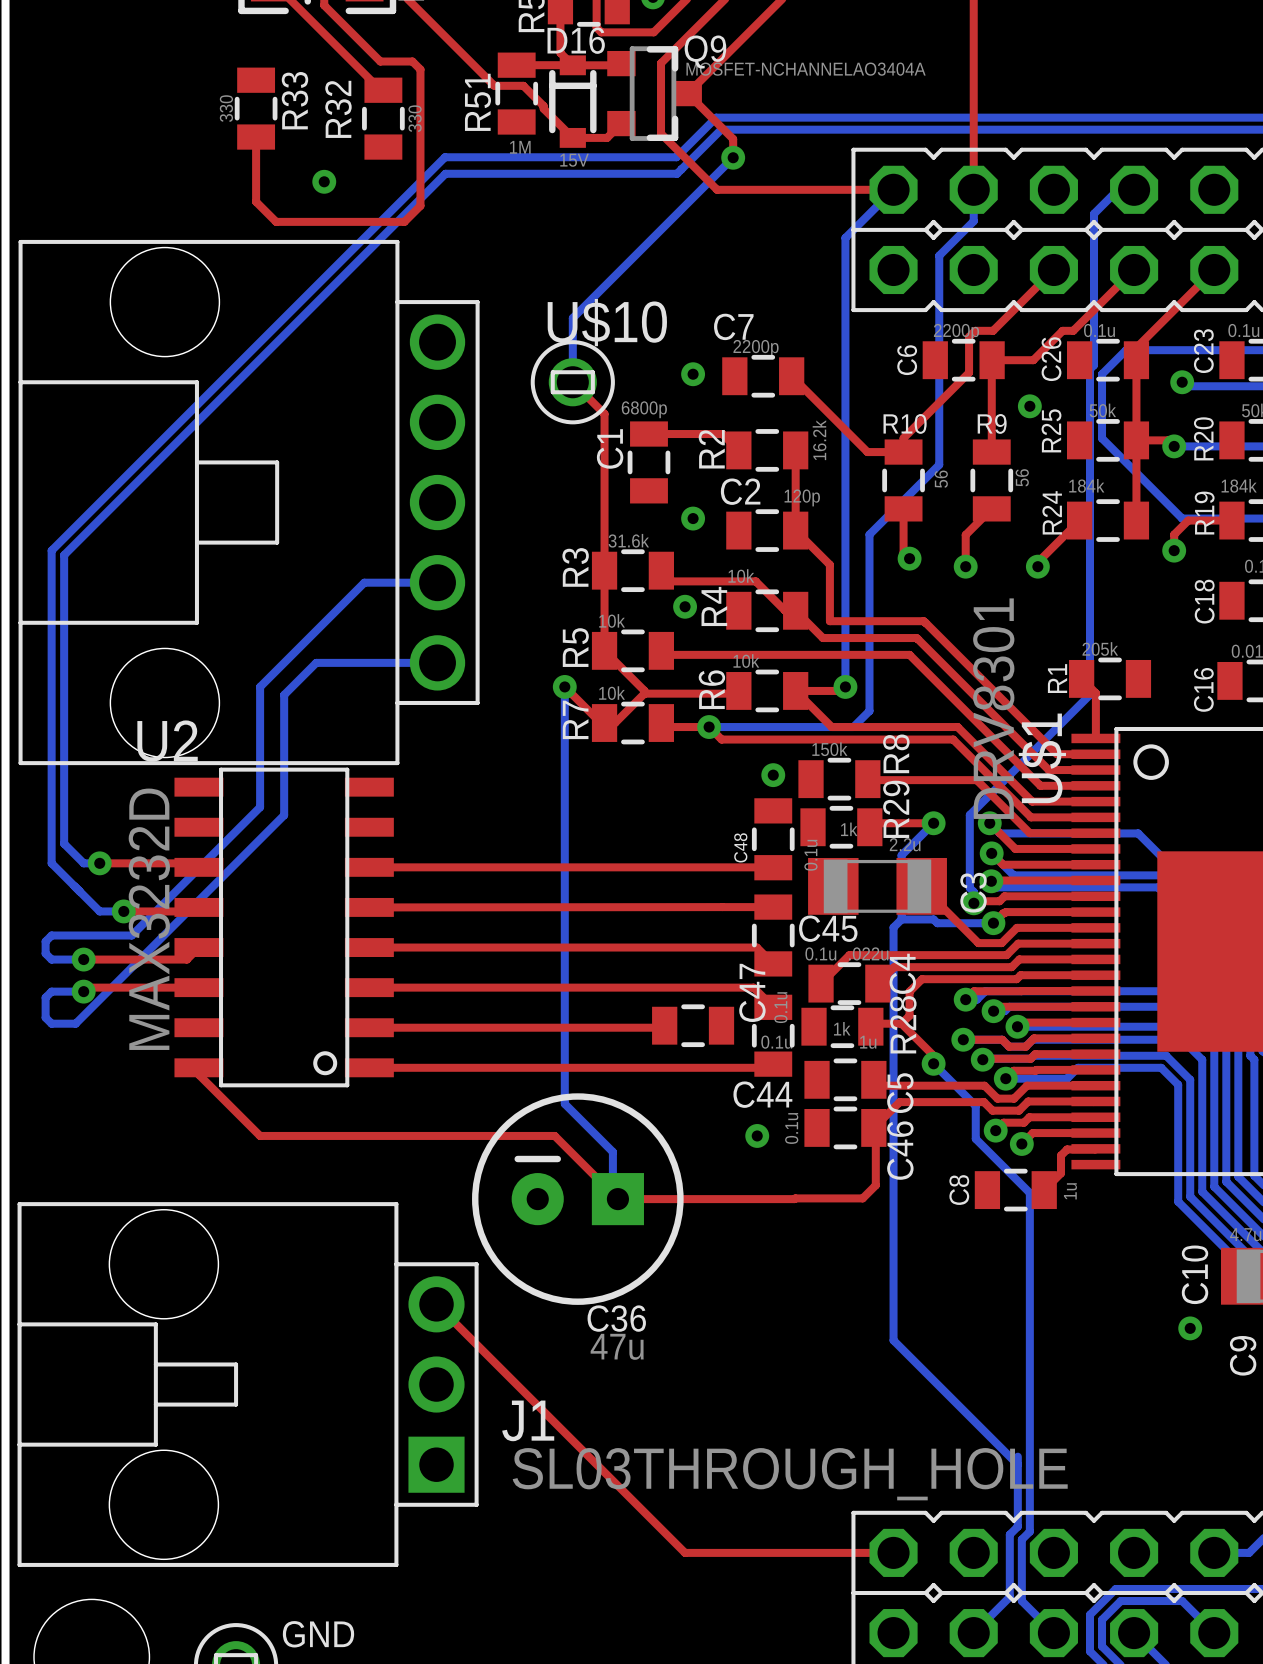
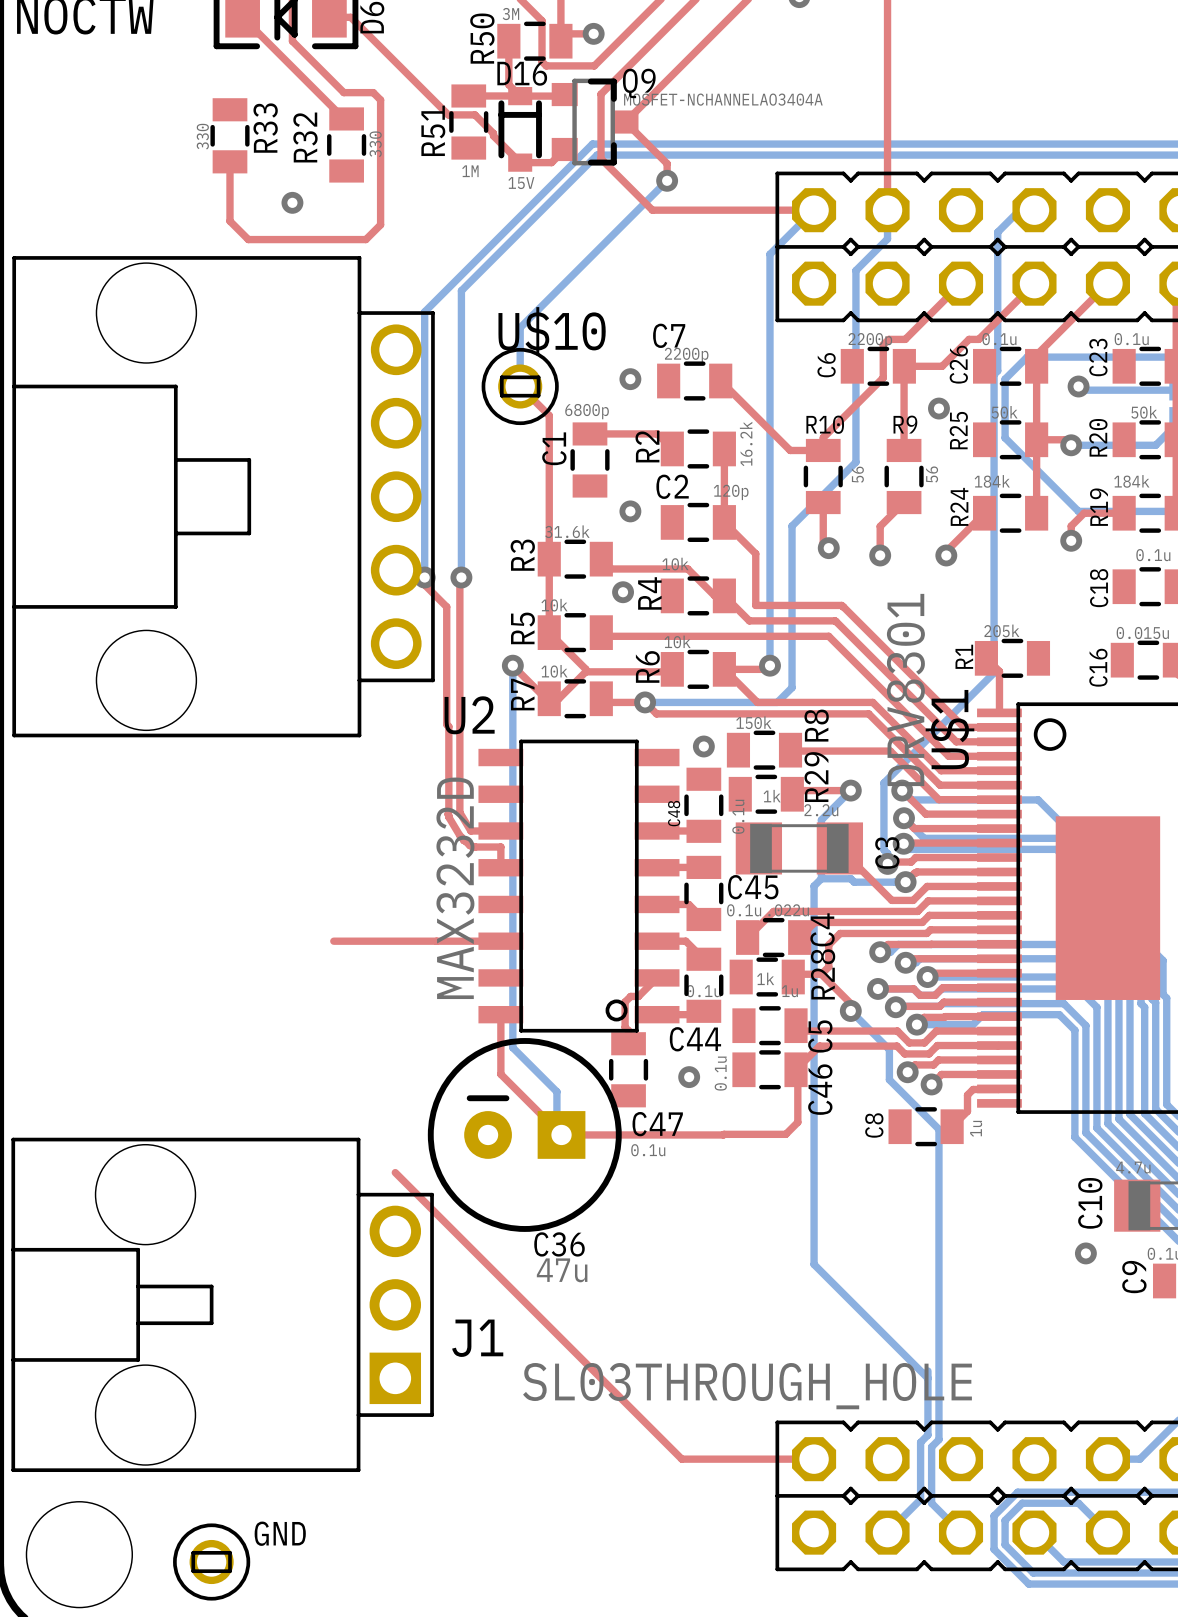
bottom track: (716, 117) (676, 157) (445, 157) (51, 550) (51, 863) (99, 911) (123, 911) -> (651, 144) (592, 144) (424, 311) (424, 577)
bottom track: (721, 129) (677, 173) (445, 173) (64, 555) (64, 843) (83, 863) (99, 863) -> (656, 155) (597, 155) (461, 290) (461, 577)
bottom track: (437, 582) (364, 582) (260, 686) (260, 807) (131, 935) (51, 935) (45, 941) (45, 953) (51, 959) (83, 959) -> none
top track: none -> (424, 577) (424, 584) (446, 606) (448, 814) (459, 835) (469, 845) (500, 847) (500, 867)
via: none -> (424, 577)
via: none -> (461, 577)
bottom track: (437, 662) (316, 662) (284, 694) (284, 815) (75, 1023) (51, 1023) (45, 1017) (45, 997) (51, 991) (83, 991) -> none
top track: (99, 863) (194, 863) (198, 867) -> none
via: (99, 863) -> none
top track: (369, 867) (519, 867) -> (461, 577) (459, 579) (459, 812) (470, 830)
top track: (551, 867) (722, 867) -> none
top track: (198, 907) (194, 911) (123, 911) -> none
top track: (722, 907) (369, 907) -> none
via: (123, 911) -> none
U2 position: (284, 927) -> (578, 886)
top track: (198, 947) (186, 959) (83, 959) -> none
top track: (369, 947) (722, 947) -> none
via: (83, 959) -> none
top track: (198, 987) (87, 987) (83, 991) -> none
top track: (551, 987) (722, 987) -> none
via: (83, 991) -> none
top track: (664, 1025) (662, 1027) (369, 1027) -> none
C47 rotation: 0° (693, 1025) -> 90° clockwise (628, 1069)
C47 position: (693, 1025) -> (628, 1069)
top track: none -> (657, 977) (638, 996) (630, 996) (625, 1002) (625, 1027) (628, 1030) (628, 1043)
top track: (198, 1067) (198, 1074) (260, 1135) (554, 1135) -> (500, 1014) (500, 1074) (503, 1077)
top track: (369, 1067) (722, 1067) -> none
top track: (436, 1304) (685, 1552) (749, 1552) -> (395, 1172) (681, 1459)

